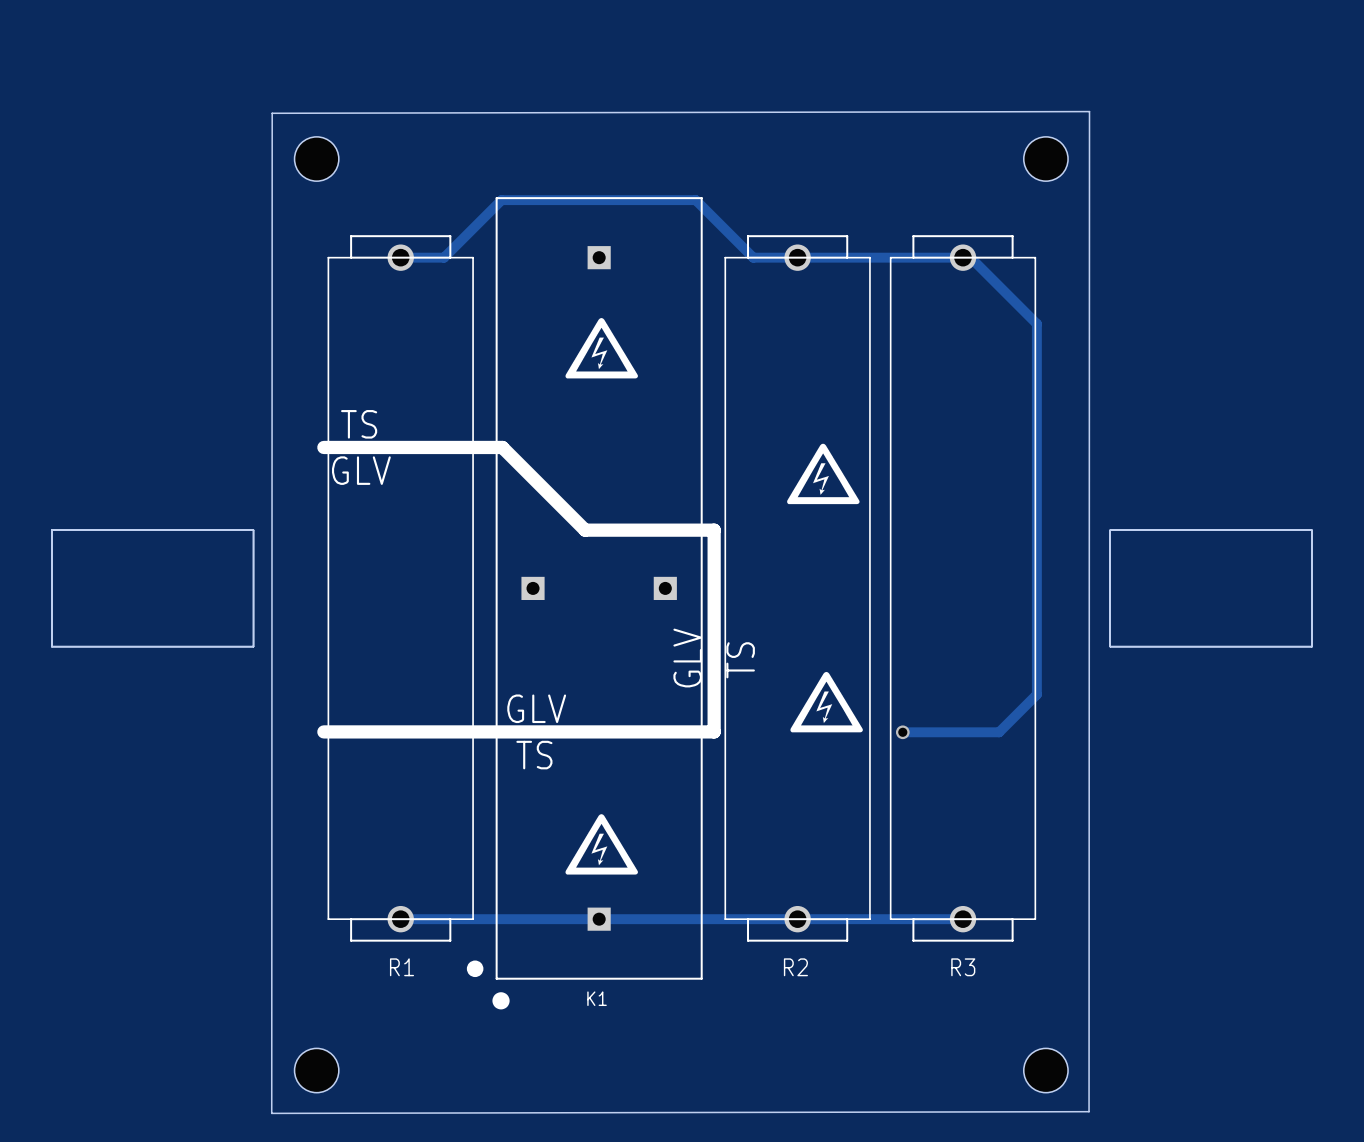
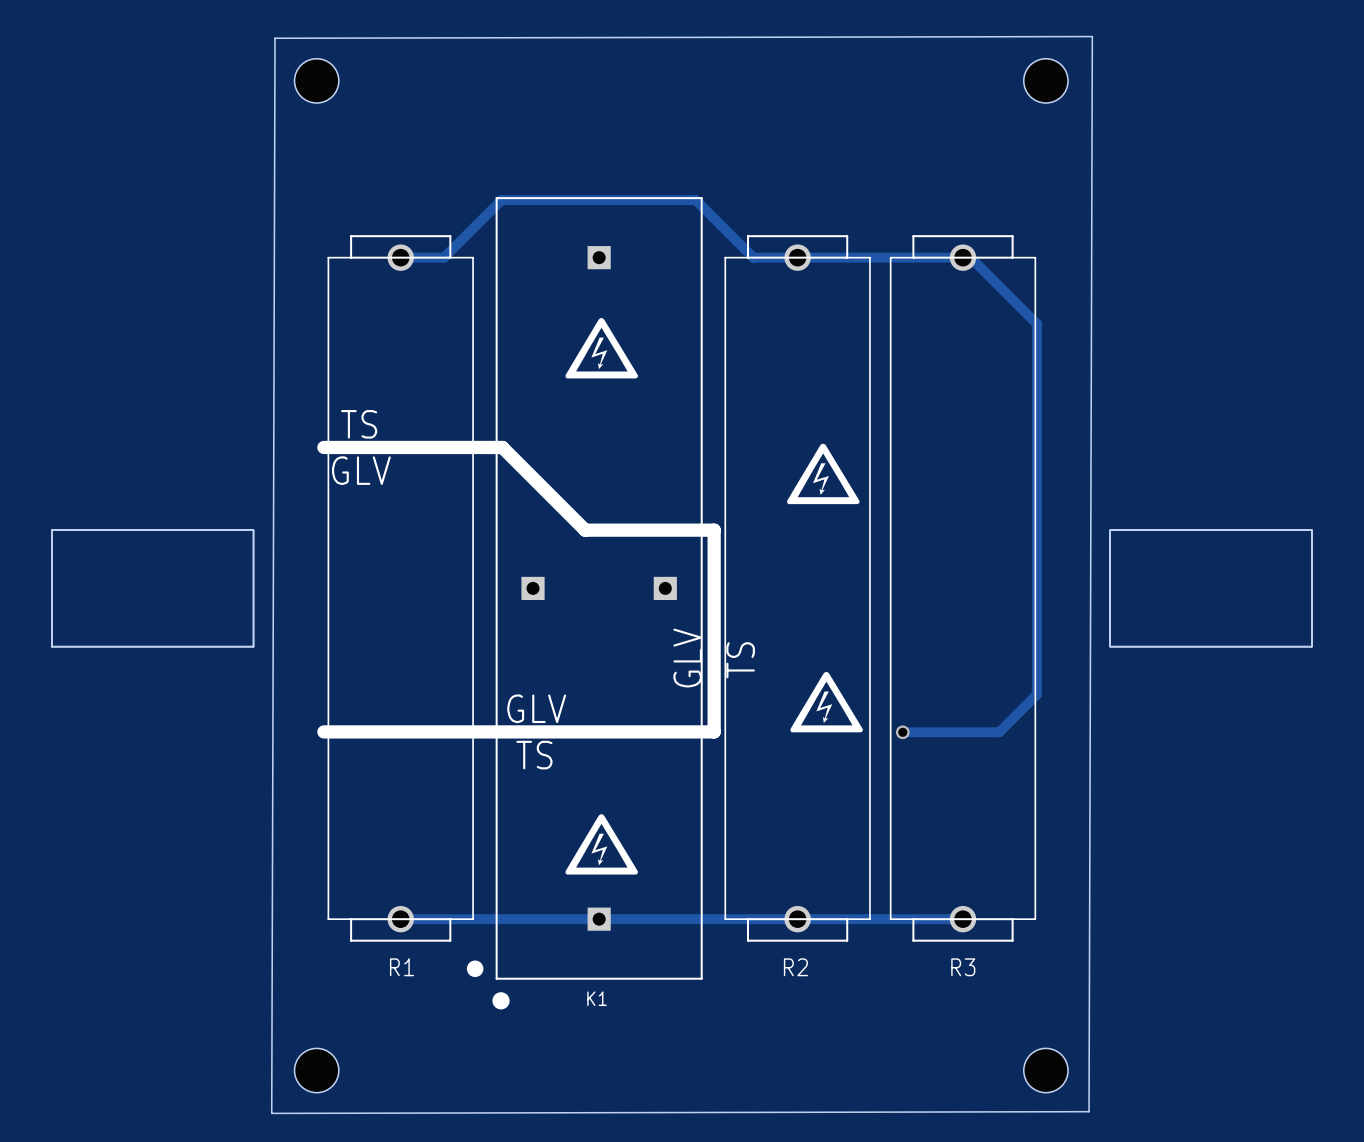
part position: (316, 159) -> (316, 80)
part position: (1045, 159) -> (1045, 80)
board edge: (1089, 1111) (1089, 111) (272, 113) (271, 1113) -> (1089, 1111) (1092, 36) (275, 38) (271, 1113)

